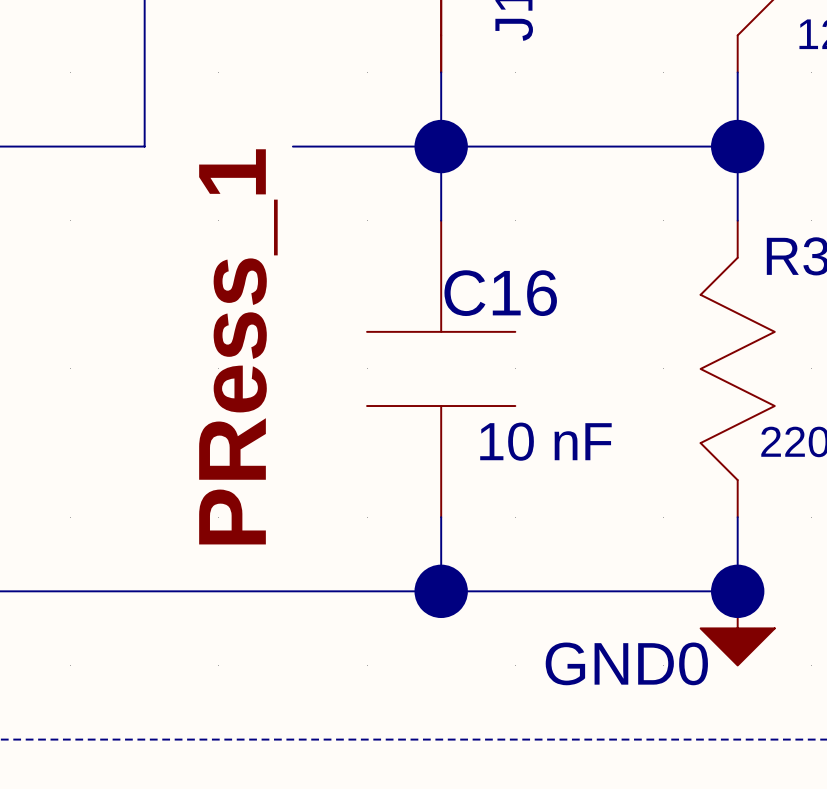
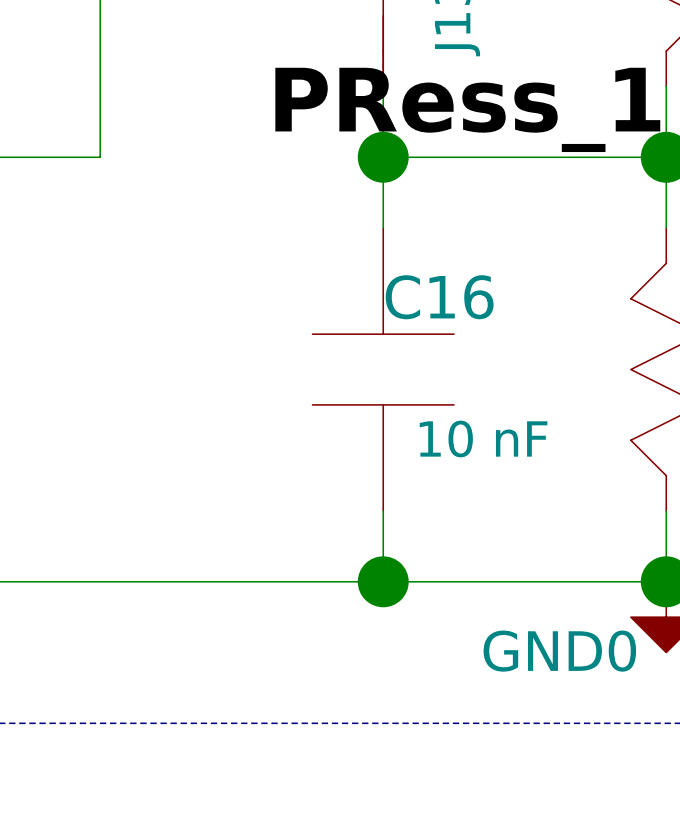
wire: (292, 146) (441, 146) -> none
label rotation: 0° (238, 346) -> 90° clockwise (467, 109)

